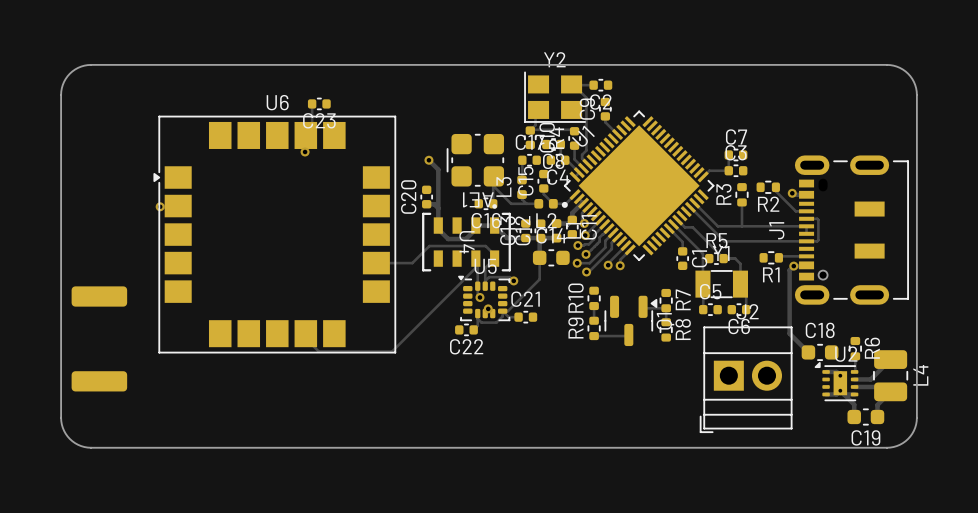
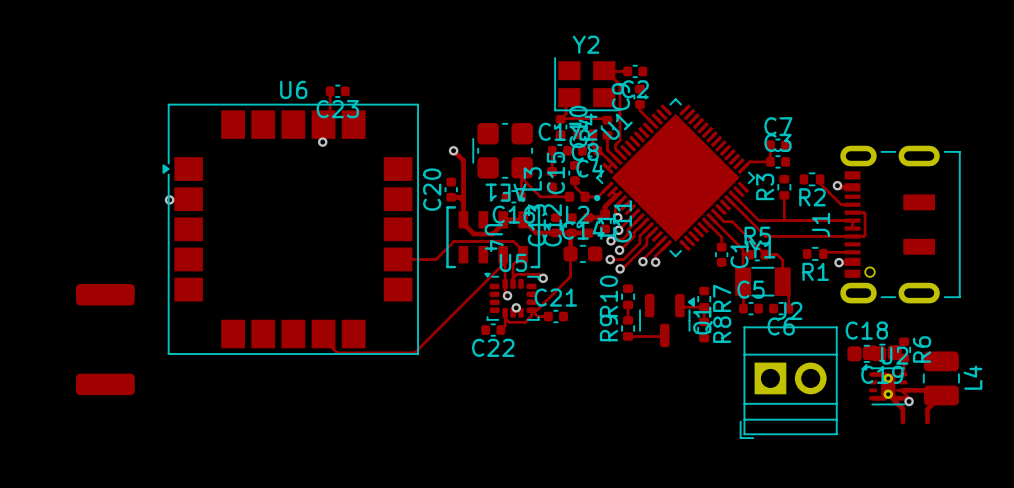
board edge: (91, 64) (886, 64) (899, 67) (912, 78) (916, 94) (916, 417) (913, 430) (902, 443) (886, 447) (91, 447) (78, 444) (65, 433) (61, 417) (61, 94) (62, 85) (69, 73) (81, 66) (91, 64) -> none
track: (793, 266) (789, 270) (789, 333) (808, 352) -> none
track: (890, 359) (870, 379) (854, 379) -> none
track: none -> (897, 390) (901, 390) (909, 397) (909, 401)
via: none -> (909, 401)
C19 position: (865, 416) -> (882, 352)

